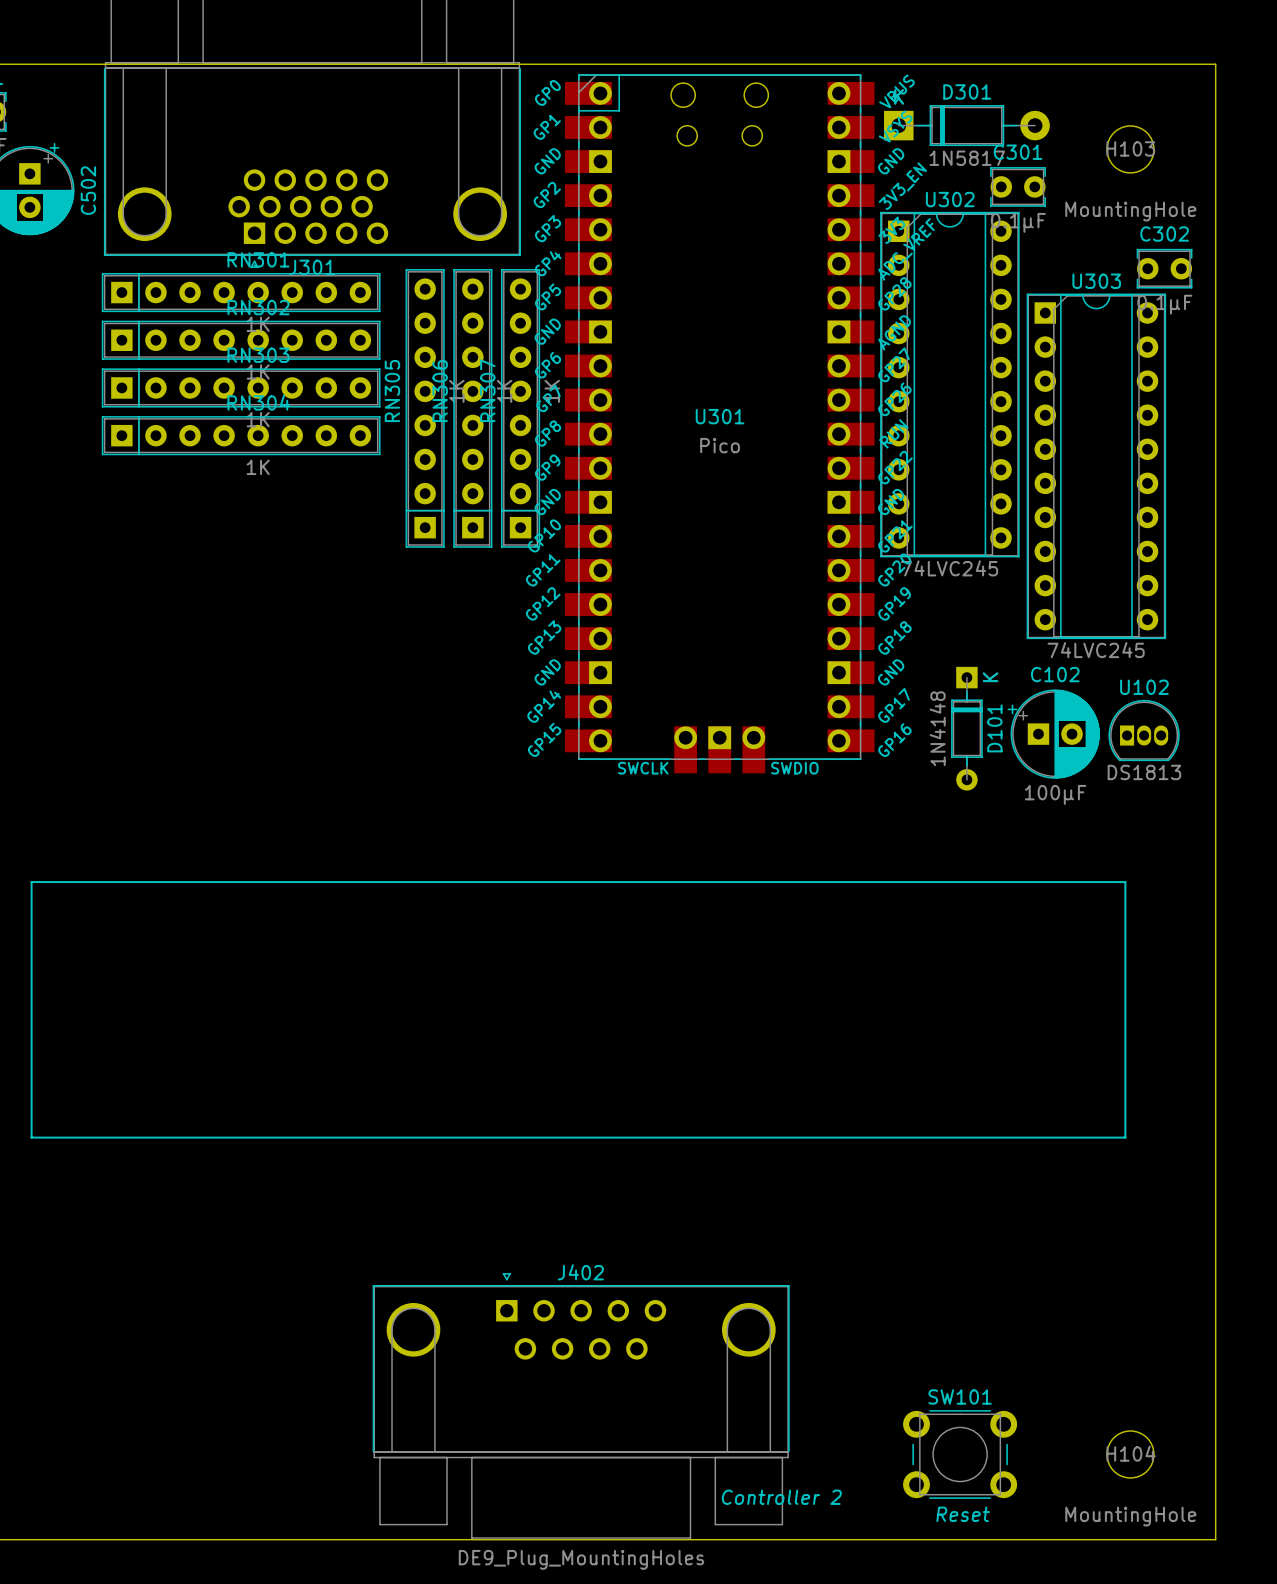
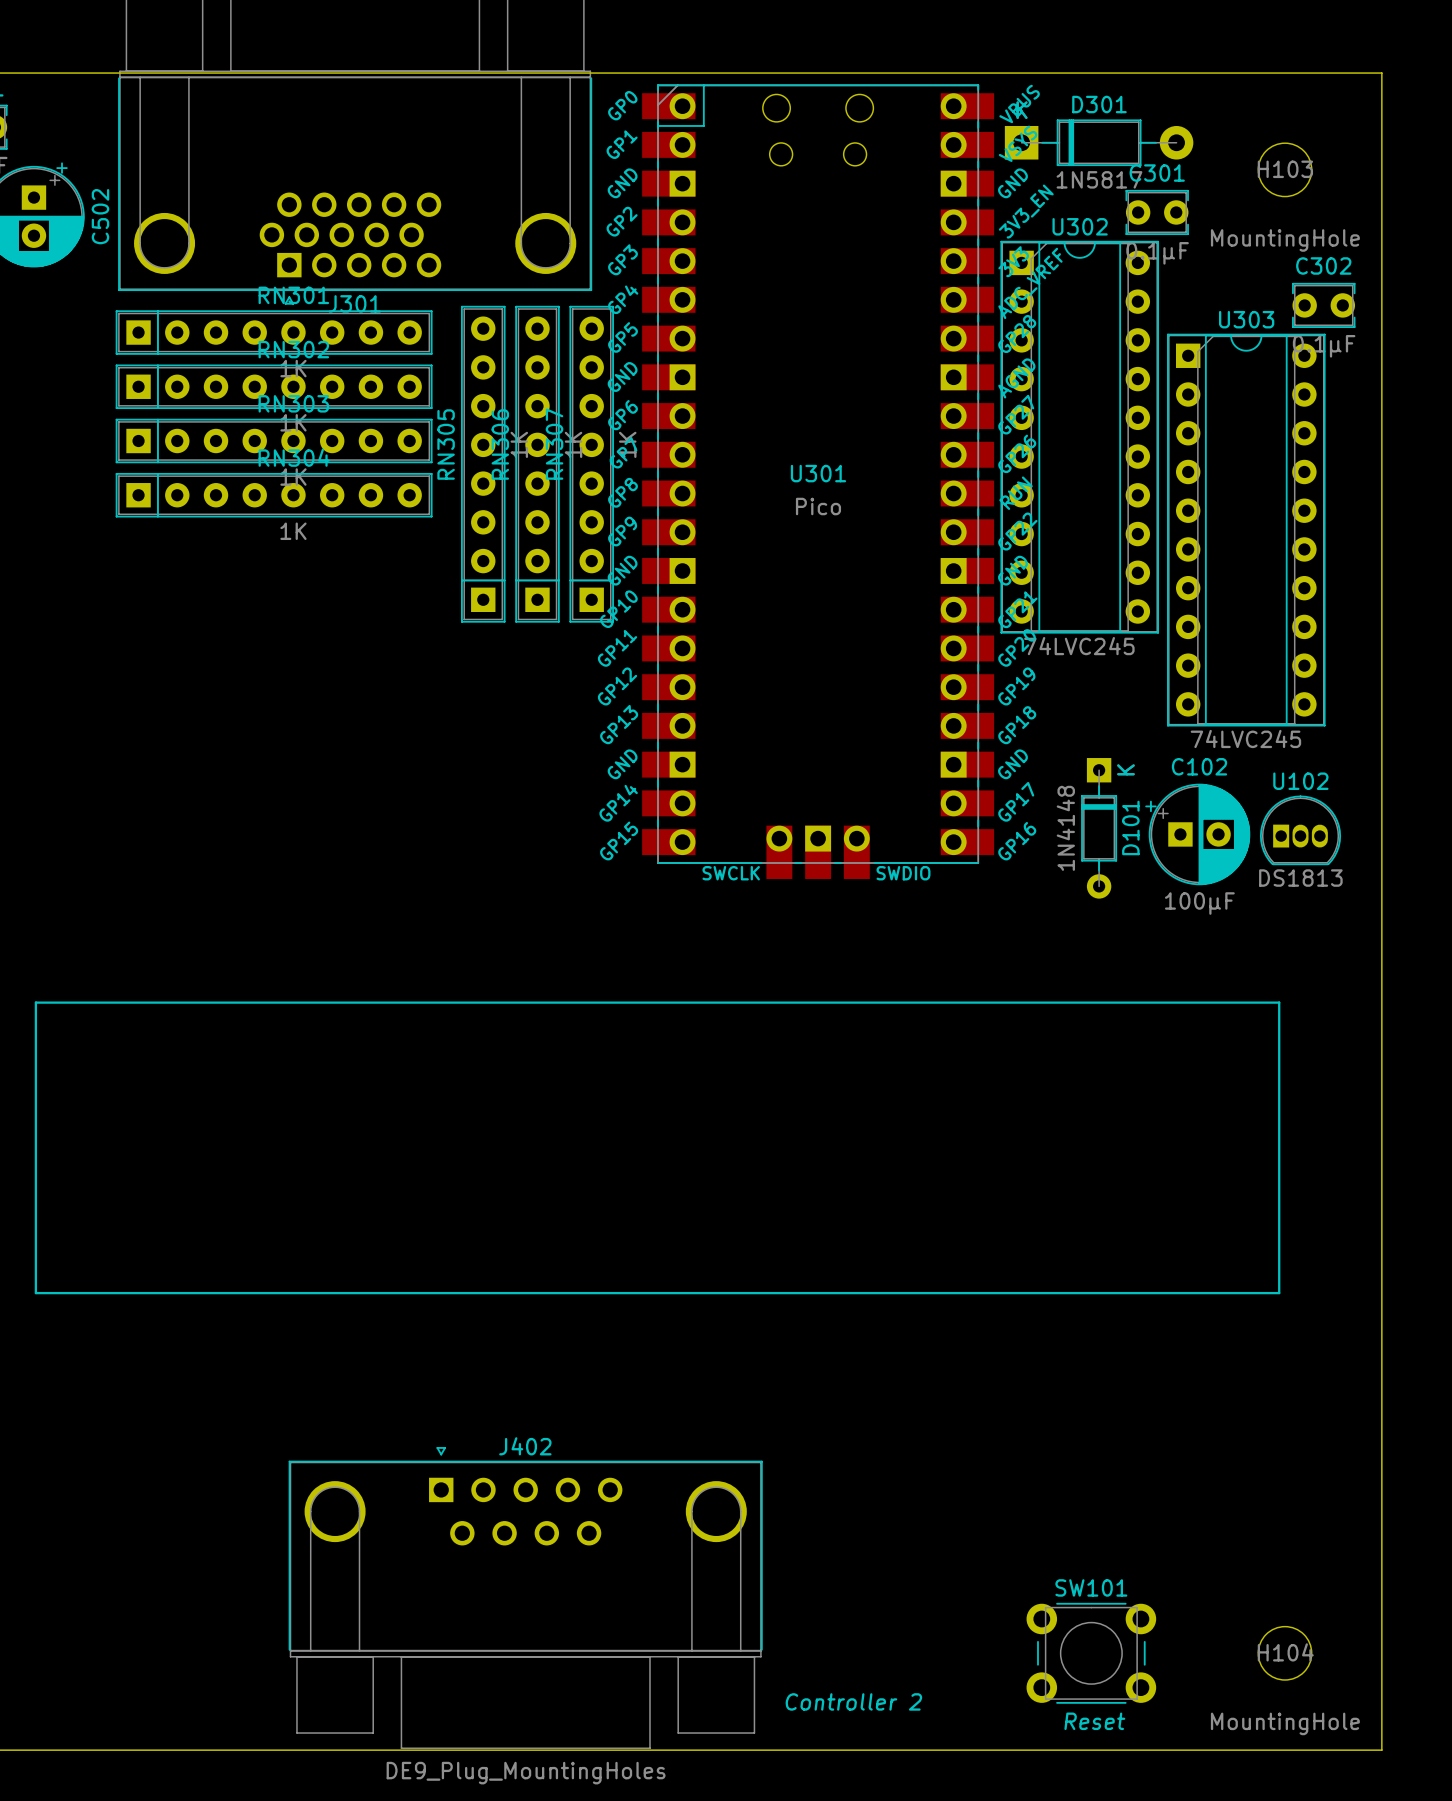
J402 position: (581, 1405) -> (525, 1598)
text position: Controller 2 (781, 1497) -> Controller 2 (853, 1701)

